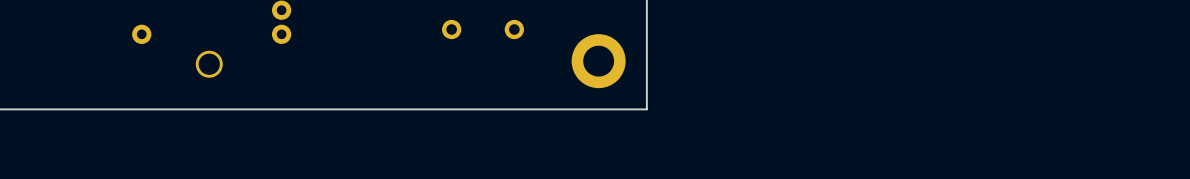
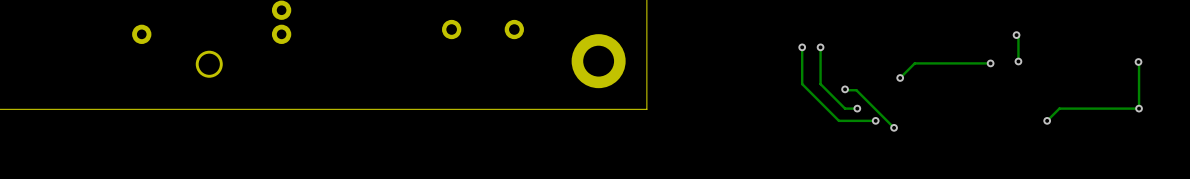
track: none -> (1016, 35) (1018, 37) (1018, 61)
via: none -> (1016, 35)
track: none -> (802, 47) (802, 84) (838, 120) (875, 120)
via: none -> (802, 47)
track: none -> (820, 47) (820, 84) (845, 108) (857, 108)
via: none -> (820, 47)
via: none -> (1018, 61)
track: none -> (1138, 61) (1139, 108) (1059, 108) (1047, 120)
via: none -> (1138, 61)
track: none -> (990, 63) (914, 63) (900, 77)
via: none -> (990, 63)
via: none -> (900, 77)
track: none -> (845, 89) (856, 90) (894, 127)
via: none -> (845, 89)
via: none -> (857, 108)
via: none -> (1139, 108)
via: none -> (875, 120)
via: none -> (1047, 120)
via: none -> (894, 127)

